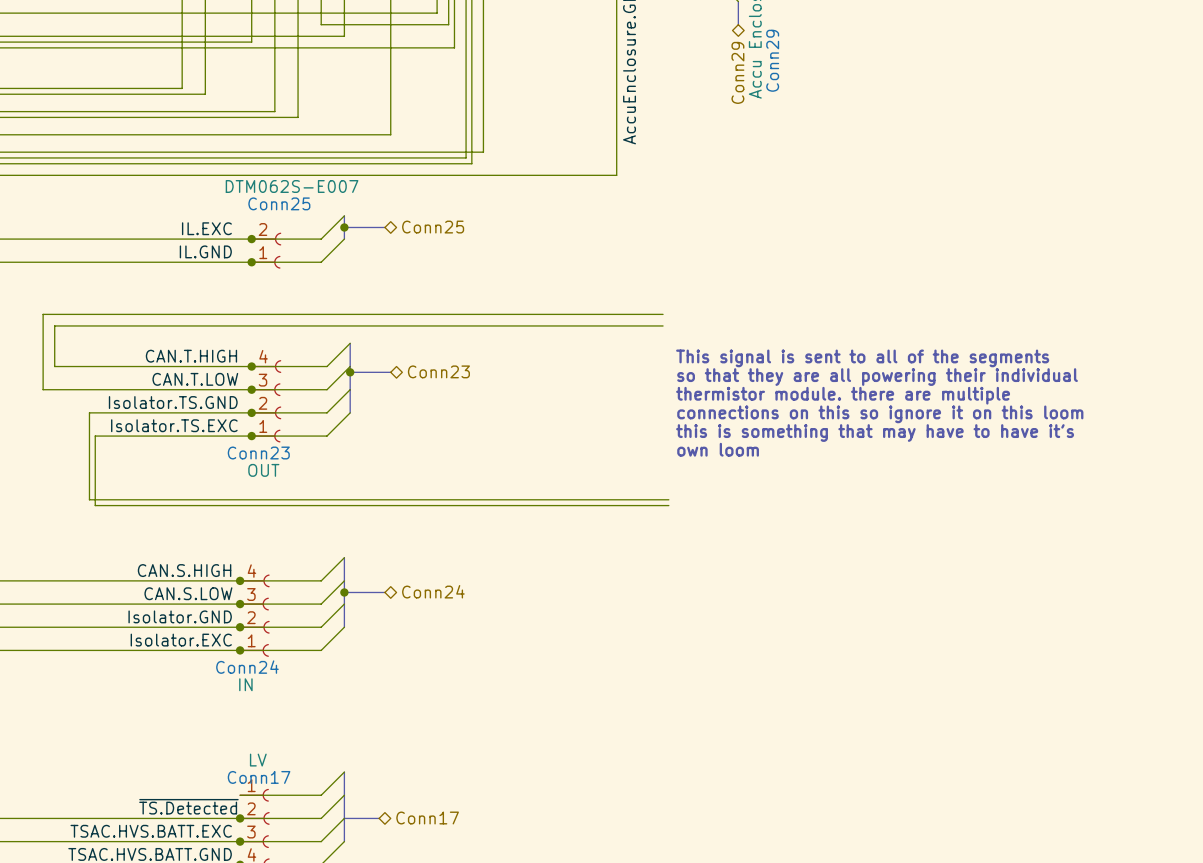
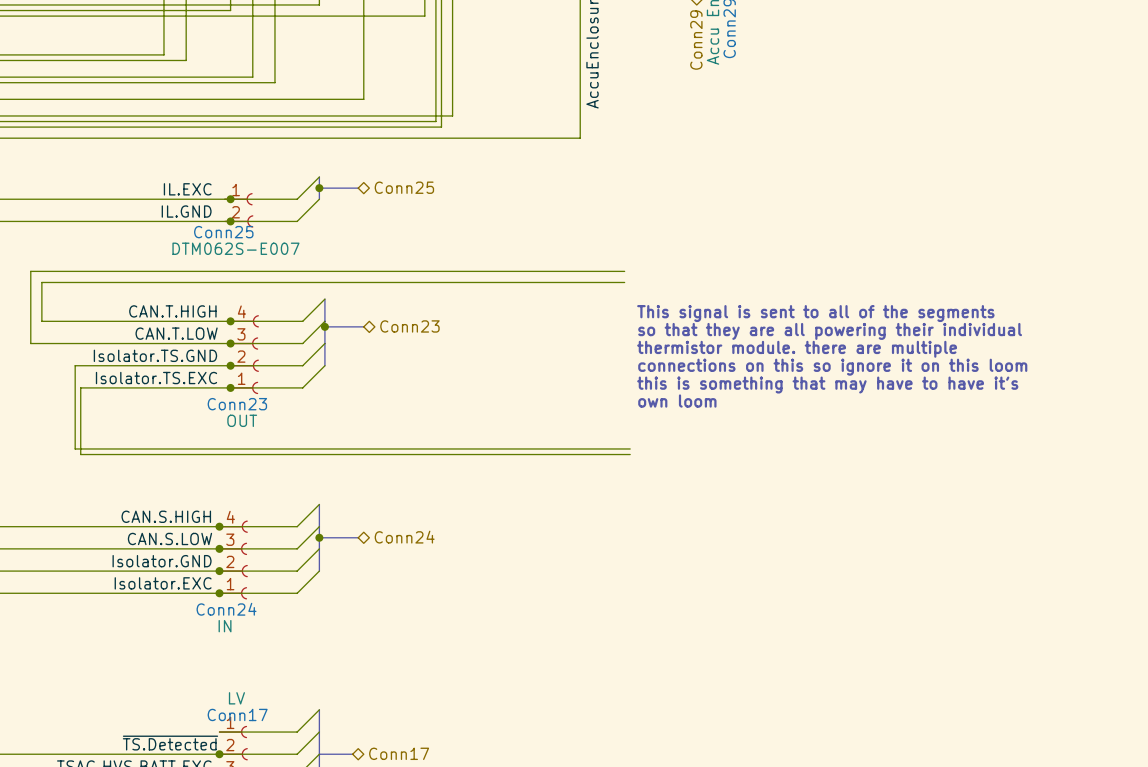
Conn25 text position: DTM062S-E007 (292, 186) -> DTM062S-E007 (235, 248)
Conn25 name position: Conn25 (279, 203) -> Conn25 (223, 232)
Conn25 flip: as is (277, 250) -> up-down (249, 210)

